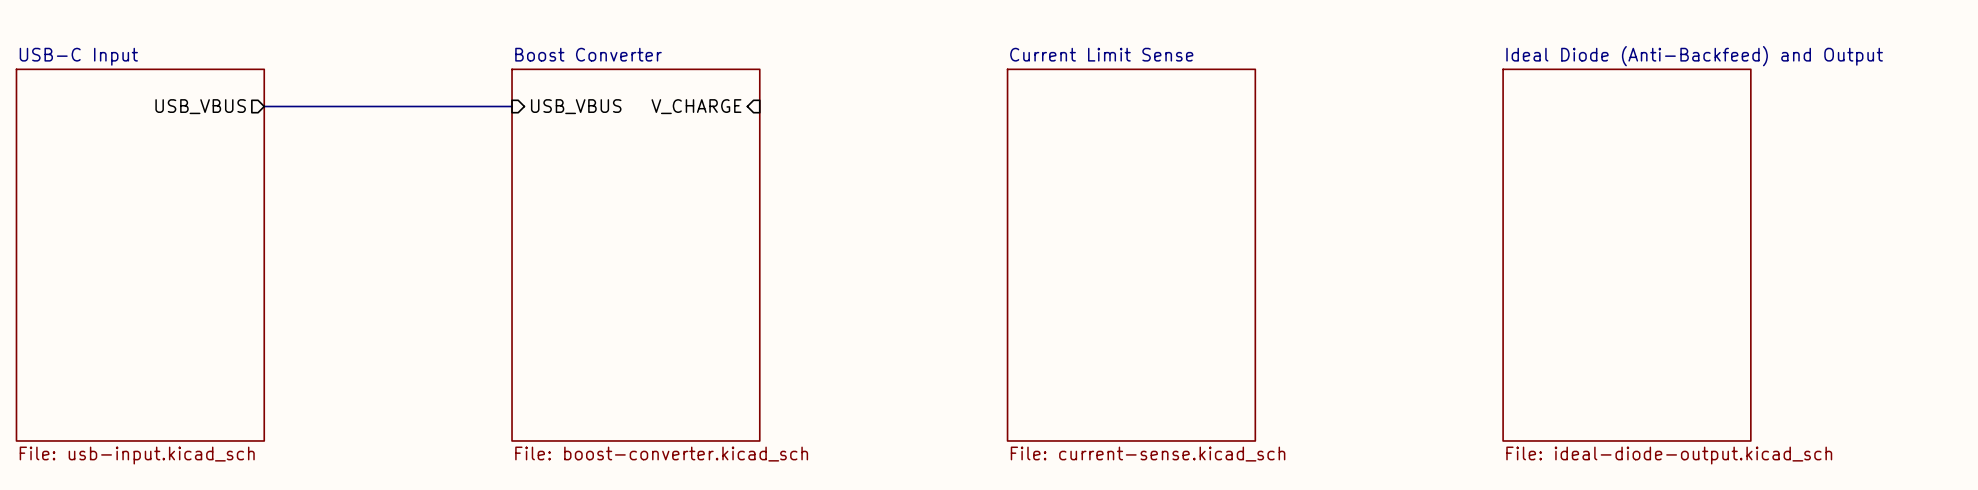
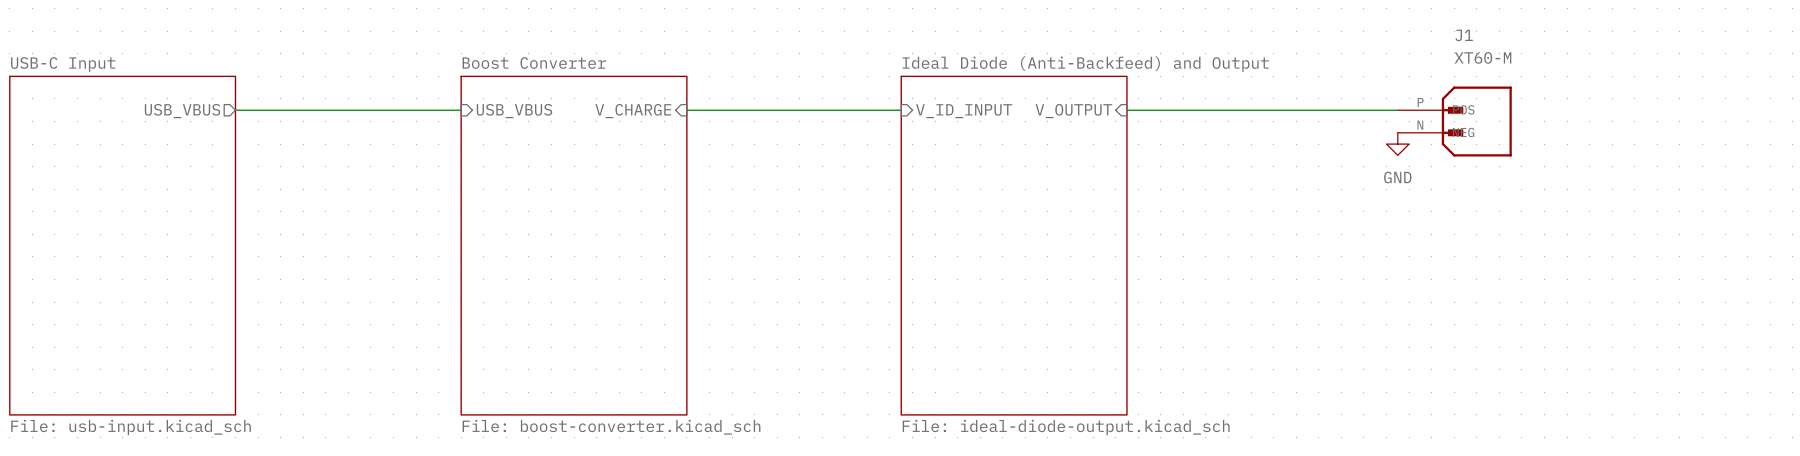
wire: none -> (686, 110) (901, 110)
sheet pin: none -> V_ID_INPUT (964, 111)
sheet pin: none -> V_OUTPUT (1073, 111)
wire: none -> (1126, 110) (1397, 110)
J1: none -> XT60-M (1454, 121)
power symbol: none -> GND (1397, 144)
sheet Ideal Diode (Anti-Backfeed) and Output: none -> File: ideal-diode-output.kicad_sch (1014, 245)
sheet Current Limit Sense: File: current-sense.kicad_sch (1131, 255) -> none
sheet Ideal Diode (Anti-Backfeed) and Output: File: ideal-diode-output.kicad_sch (1626, 255) -> none

